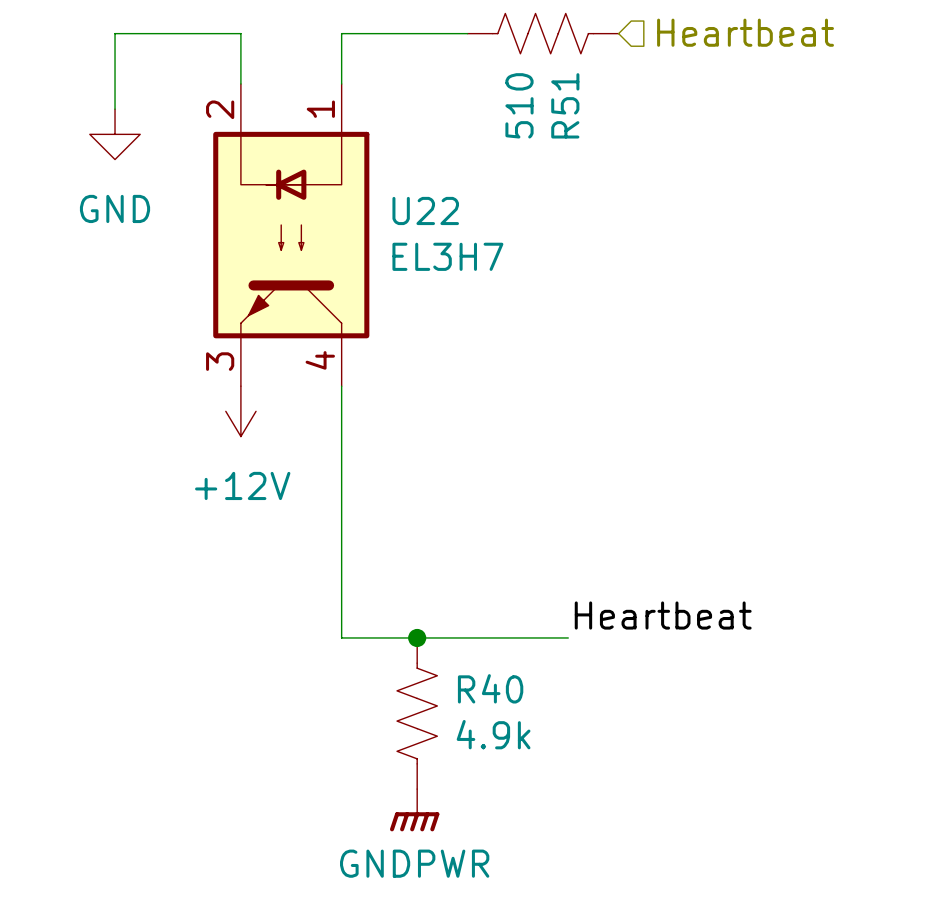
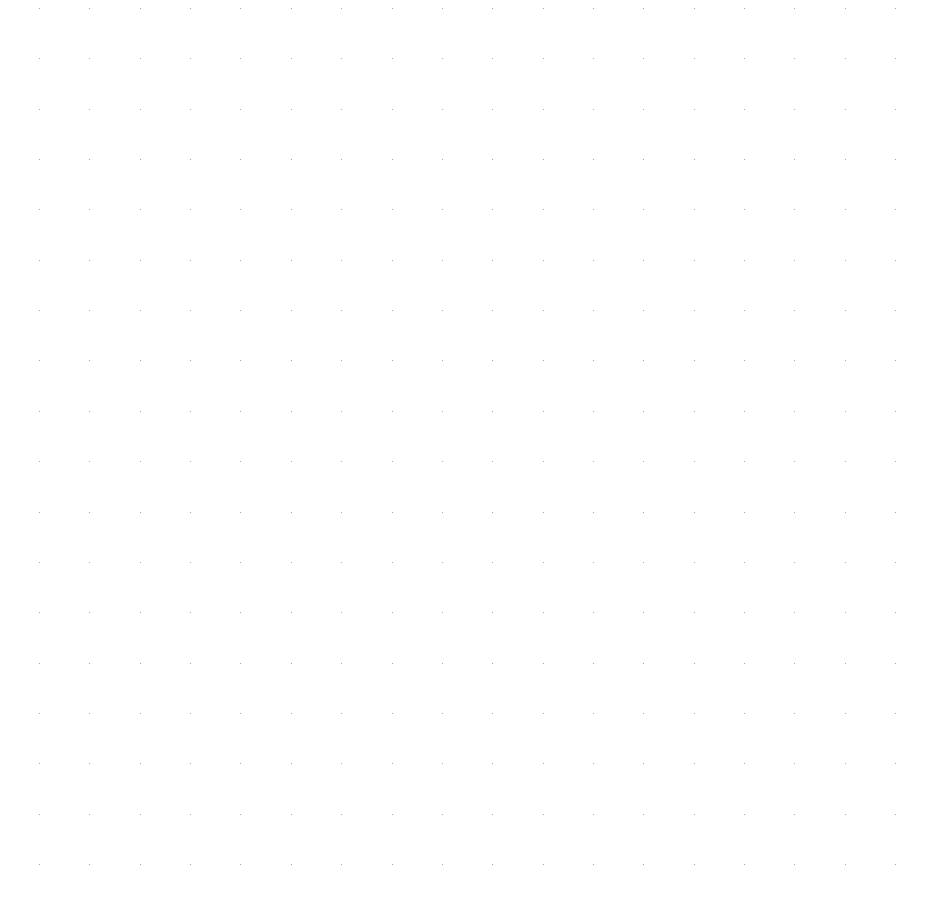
hierarchical label: Heartbeat (745, 32) -> none
wire: (467, 33) (341, 33) (341, 83) -> none
R51: 510 (543, 33) -> none
wire: (240, 83) (240, 33) (115, 33) (115, 109) -> none
power symbol: GND (115, 134) -> none
U22: EL3H7 (291, 235) -> none
wire: (341, 386) (341, 637) (568, 637) -> none
power symbol: +12V (240, 411) -> none
label: Heartbeat (663, 615) -> none
junction: (417, 637) -> none
R40: 4.9k (417, 713) -> none
power symbol: GNDPWR (414, 810) -> none

